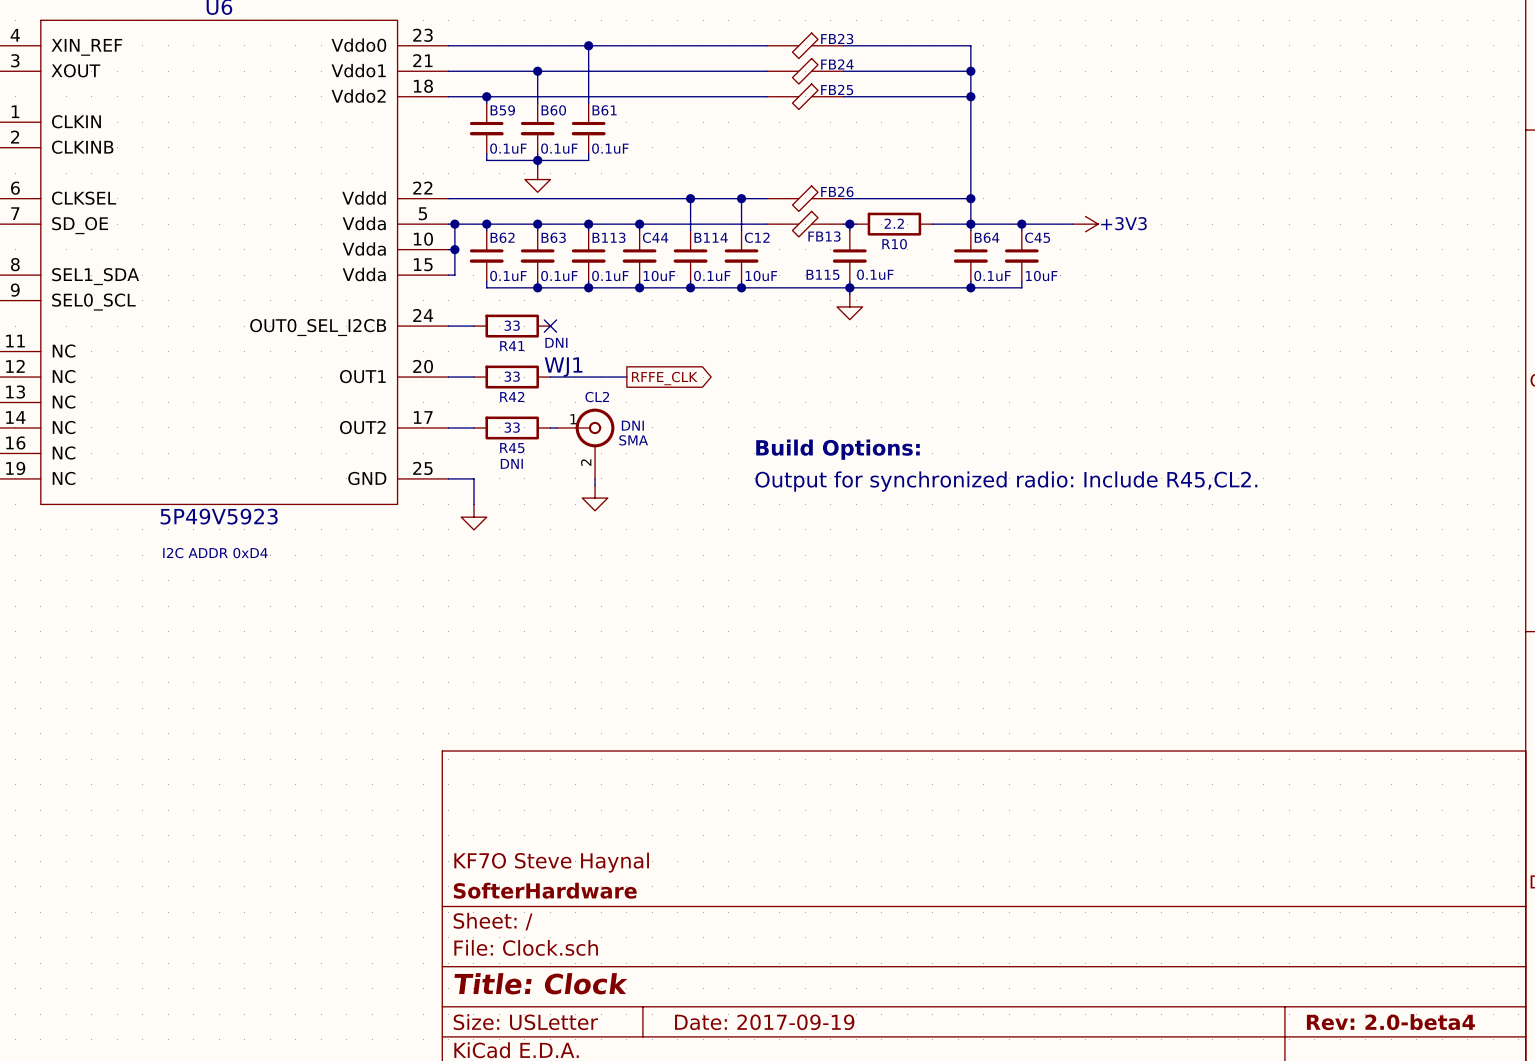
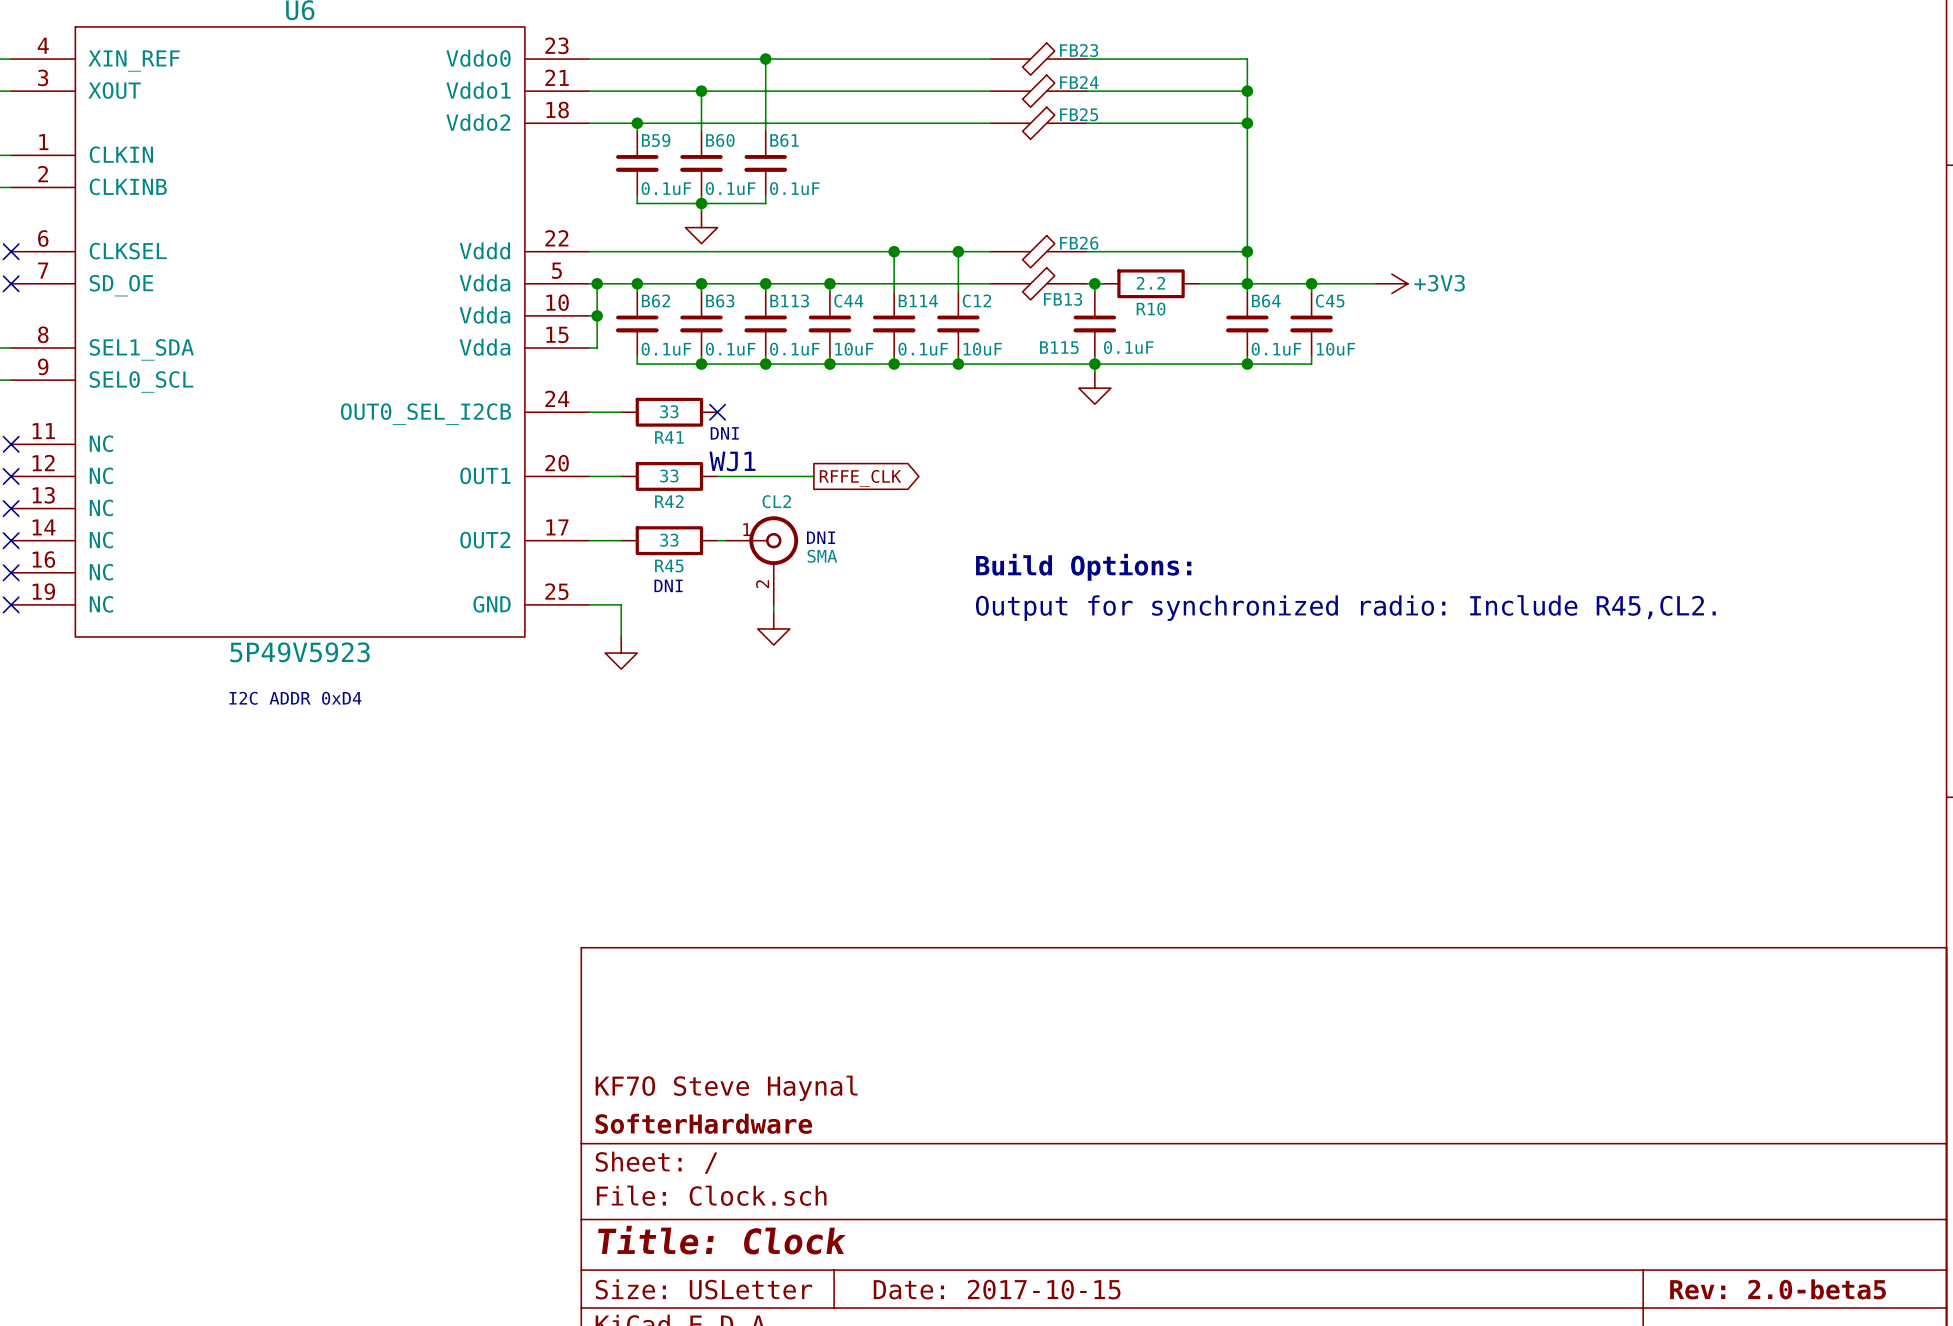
title block: Date: 2017-09-19 (764, 1022) -> Date: 2017-10-15 (997, 1289)
title block: Rev: 2.0-beta4 (1390, 1022) -> Rev: 2.0-beta5 (1778, 1289)

